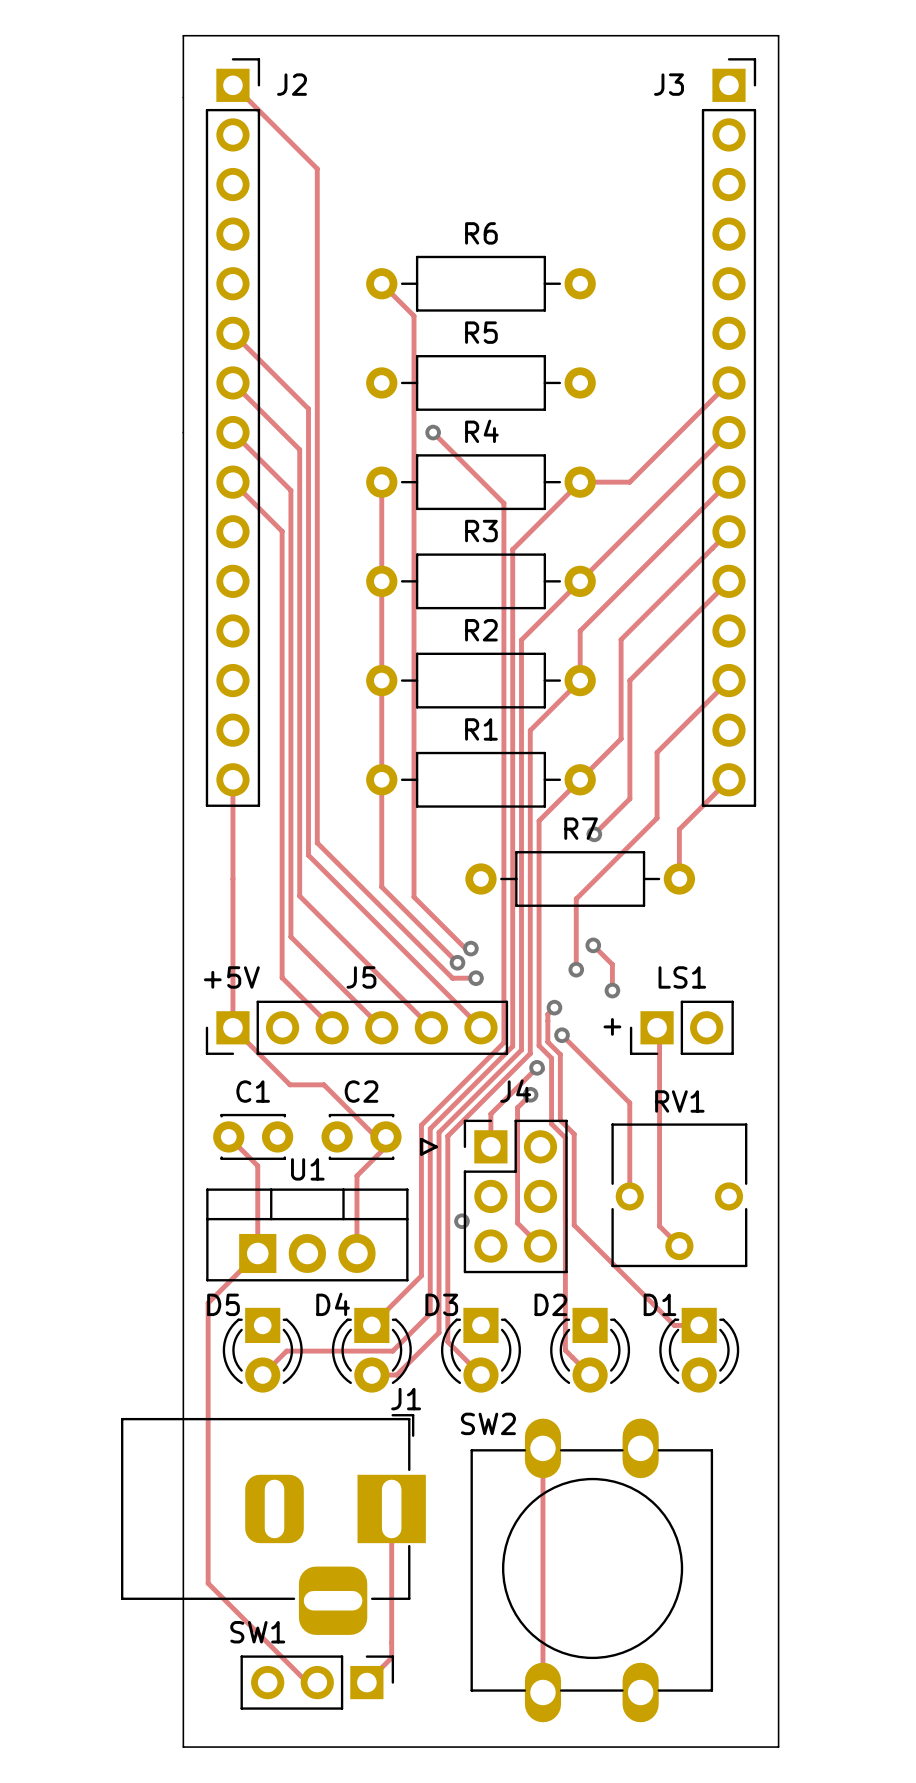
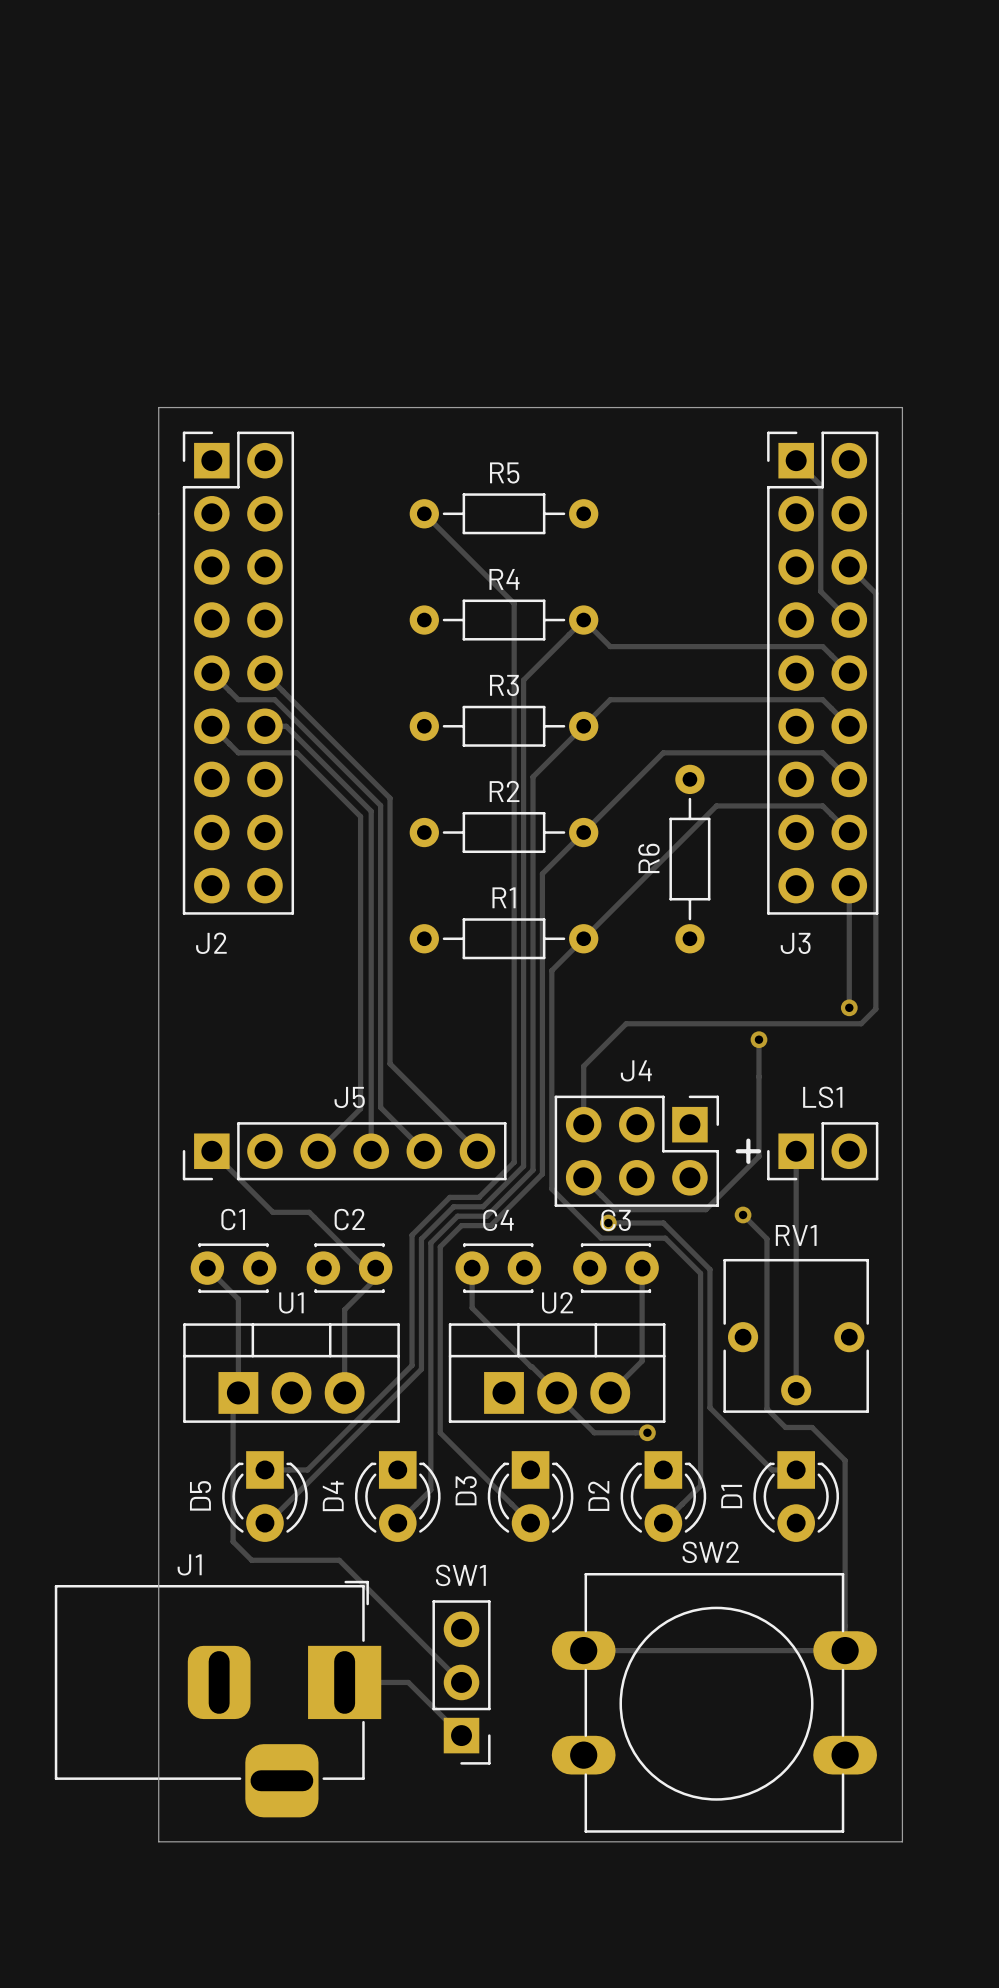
J2 footprint: [205, 58, 261, 807] -> [182, 431, 295, 915]
J3 footprint: [701, 58, 757, 807] -> [767, 431, 879, 915]
J2 name position: J2 (292, 84) -> J2 (211, 943)
J3 name position: J3 (669, 84) -> J3 (795, 943)
track: (232, 85) (317, 168) (317, 842) (452, 978) (476, 978) -> none
R6 name position: R6 (481, 233) -> R6 (648, 858)
R6 footprint: [366, 255, 596, 312] -> [669, 764, 711, 954]
track: (381, 283) (414, 315) (414, 897) (465, 948) (470, 948) -> none
board edge: (183, 333) (183, 35) (778, 35) (778, 1747) (183, 1747) (183, 1672) -> (158, 407) (902, 407) (902, 1841) (158, 1841)
track: (232, 333) (308, 408) (308, 855) (399, 946) -> (264, 673) (390, 798) (390, 1063)
R5 footprint: [366, 355, 596, 411] -> [409, 493, 599, 535]
track: (232, 382) (299, 449) (299, 896) (390, 986) -> (211, 673) (238, 699) (274, 699) (380, 805) (380, 1107)
track: (728, 382) (629, 482) (580, 482) (512, 549) (512, 1046) (430, 1128) (430, 1313) (392, 1351) (286, 1351) (262, 1375) -> none
track: none -> (796, 460) (820, 485) (820, 591) (849, 620)
track: (232, 432) (290, 490) (290, 936) (381, 1027) -> none
track: none -> (424, 513) (514, 603) (514, 1162) (479, 1197) (449, 1197) (412, 1235) (412, 1365) (307, 1469) (264, 1469)
track: (433, 432) (503, 503) (503, 1042) (421, 1125) (421, 1275) (371, 1325) -> none
via: (433, 432) -> none
track: (728, 432) (521, 640) (521, 1049) (439, 1132) (439, 1332) (396, 1375) (371, 1375) -> none
R4 footprint: [366, 454, 596, 511] -> [409, 599, 599, 641]
track: (232, 482) (282, 531) (282, 977) (332, 1027) -> (211, 726) (238, 752) (296, 752) (360, 816) (360, 1108) (318, 1151)
track: (381, 482) (381, 710) -> (264, 726) (286, 726) (371, 811)
track: (728, 482) (604, 606) -> (849, 726) (822, 699) (610, 699)
track: none -> (849, 566) (875, 593) (875, 1009) (861, 1023) (626, 1023) (583, 1066) (583, 1124)
track: (728, 531) (621, 639) (621, 738) (539, 820) (539, 1045) (551, 1058) (551, 1123) (565, 1137) (565, 1350) (590, 1375) -> none
R3 footprint: [366, 553, 596, 610] -> [409, 705, 599, 747]
track: (728, 581) (654, 655) -> (849, 779) (822, 752) (663, 752)
track: none -> (849, 673) (822, 646) (610, 646) (583, 620) (523, 680) (523, 1166) (483, 1206) (453, 1206) (421, 1239) (421, 1369) (267, 1523)
track: (580, 630) (580, 680) (530, 730) (530, 1053) (447, 1136) (447, 1341) (480, 1375) -> (583, 726) (533, 776) (533, 1170) (486, 1216) (457, 1216) (430, 1242) (430, 1490) (397, 1523)
R2 footprint: [366, 652, 596, 709] -> [409, 812, 599, 854]
track: (629, 680) (629, 798) (594, 834) -> (636, 779) (542, 873) (542, 1174) (490, 1225) (461, 1225) (440, 1246) (440, 1432) (530, 1523)
track: (728, 680) (704, 705) -> (849, 832) (822, 805) (716, 805)
R1 footprint: [366, 751, 596, 808] -> [409, 918, 599, 960]
track: (657, 752) (657, 818) (576, 898) (576, 969) -> (666, 856) (551, 970) (551, 1188) (601, 1238) (665, 1238) (700, 1273) (700, 1485) (663, 1523)
track: (232, 779) (232, 1027) -> none
track: (728, 779) (679, 829) (679, 878) -> none
track: none -> (849, 885) (849, 1007)
via: (594, 834) -> none
R7: (580, 878) -> none
track: (381, 887) (457, 962) -> (371, 1000) (371, 1151)
via: none -> (849, 1007)
track: none -> (758, 1039) (758, 1156) (705, 1209) (615, 1209) (583, 1177)
via: none -> (758, 1039)
track: (593, 945) (612, 964) (612, 990) -> none
via: (593, 945) -> none
via: (470, 948) -> none
via: (457, 962) -> none
via: (576, 969) -> none
text: +5V (231, 977) -> none
via: (476, 978) -> none
via: (612, 990) -> none
track: (554, 1007) (547, 1014) (547, 1042) (560, 1054) (560, 1120) (574, 1134) (574, 1225) (674, 1325) (699, 1325) -> none
via: (554, 1007) -> none
line: none -> (748, 1140) (748, 1161) (748, 1151)
text: + (612, 1026) -> none
track: (659, 1027) (659, 1226) (679, 1246) -> none
LS1 position: (681, 1027) -> (822, 1151)
line: none -> (737, 1151) (758, 1151)
track: none -> (796, 1151) (796, 1390)
track: (562, 1035) (629, 1103) (629, 1196) -> none
via: (562, 1035) -> none
via: (537, 1067) -> none
track: (542, 1069) (537, 1067) (490, 1113) (490, 1146) -> none
track: none -> (743, 1214) (766, 1238) (766, 1408) (785, 1427) (812, 1427) (845, 1460) (845, 1650) (583, 1650)
via: none -> (743, 1214)
track: (530, 1094) (517, 1107) (517, 1223) (540, 1246) -> none
via: (530, 1094) -> none
track: none -> (608, 1223) (663, 1223) (709, 1269) (709, 1407) (772, 1469) (796, 1469)
via: none -> (608, 1223)
C4: none -> (498, 1268)
C3: none -> (615, 1268)
line: (421, 1139) (421, 1154) (436, 1146) (421, 1139) -> none
track: none -> (472, 1278) (472, 1307) (557, 1392)
track: none -> (642, 1278) (642, 1361) (610, 1392)
RV1 position: (679, 1195) -> (796, 1335)
J4 rotation: 0° (515, 1196) -> 90° clockwise (636, 1151)
J4 position: (515, 1196) -> (636, 1151)
via: (461, 1221) -> none
U2: none -> (557, 1373)
track: none -> (557, 1395) (594, 1432) (647, 1432)
track: (252, 1258) (208, 1303) (208, 1583) (307, 1682) (317, 1682) -> (233, 1398) (233, 1541) (251, 1560) (339, 1560) (461, 1682)
via: none -> (647, 1432)
D5 name rotation: 0° (223, 1304) -> 90° counterclockwise (200, 1495)
D4 name rotation: 0° (333, 1304) -> 90° counterclockwise (333, 1496)
D3 name rotation: 0° (441, 1304) -> 90° counterclockwise (466, 1490)
D2 name rotation: 0° (550, 1304) -> 90° counterclockwise (598, 1495)
D1 name rotation: 0° (660, 1304) -> 90° counterclockwise (731, 1496)
D5 position: (262, 1350) -> (264, 1496)
D4 position: (371, 1350) -> (397, 1496)
D3 position: (480, 1350) -> (530, 1496)
D2 position: (590, 1350) -> (663, 1496)
D1 position: (699, 1350) -> (796, 1496)
J1 name position: J1 (406, 1399) -> J1 (189, 1564)
SW2 name position: SW2 (488, 1423) -> SW2 (710, 1552)
track: (542, 1448) (542, 1692) -> none
track: (391, 1508) (391, 1657) (366, 1682) -> none
track: none -> (344, 1682) (408, 1682) (461, 1735)
J1 position: (273, 1524) -> (218, 1699)
SW2 rotation: 0° (591, 1570) -> 90° clockwise (714, 1702)
SW1 name position: SW1 (257, 1632) -> SW1 (460, 1575)
SW1 rotation: 0° (317, 1682) -> 90° clockwise (461, 1682)
SW1 position: (317, 1682) -> (461, 1682)

